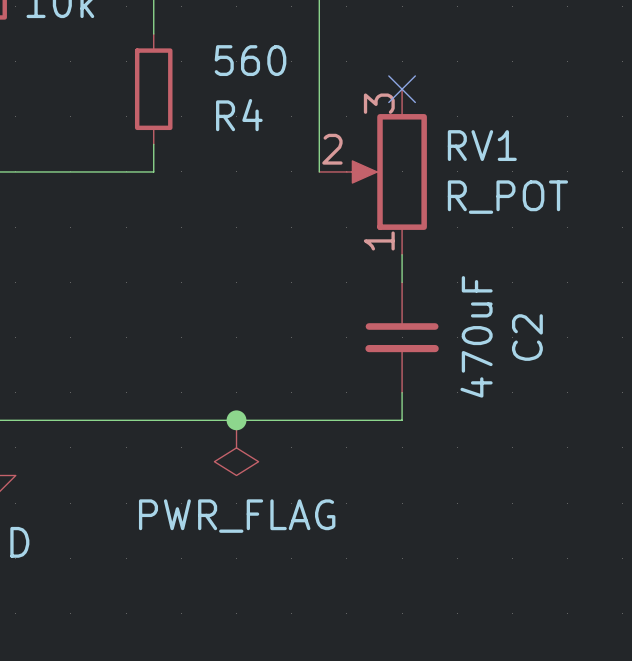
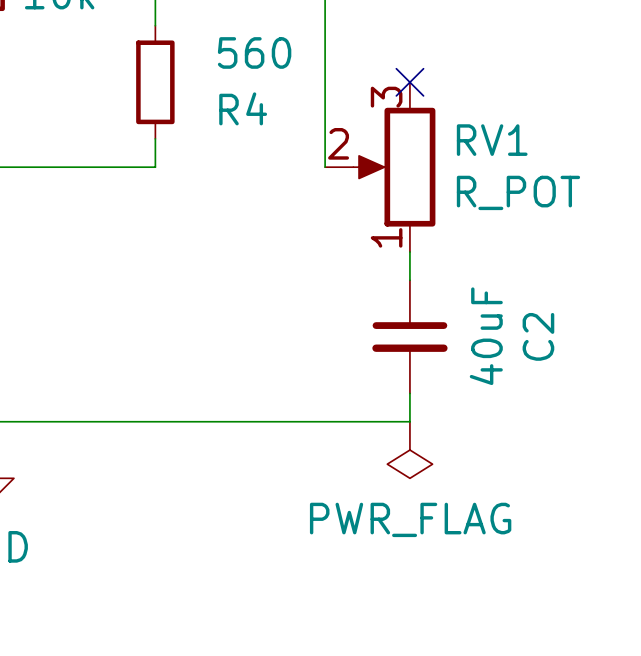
C2 value: 470uF (476, 336) -> 40uF (486, 336)
junction: (236, 420) -> none
power symbol position: PWR_FLAG (236, 447) -> PWR_FLAG (409, 450)

